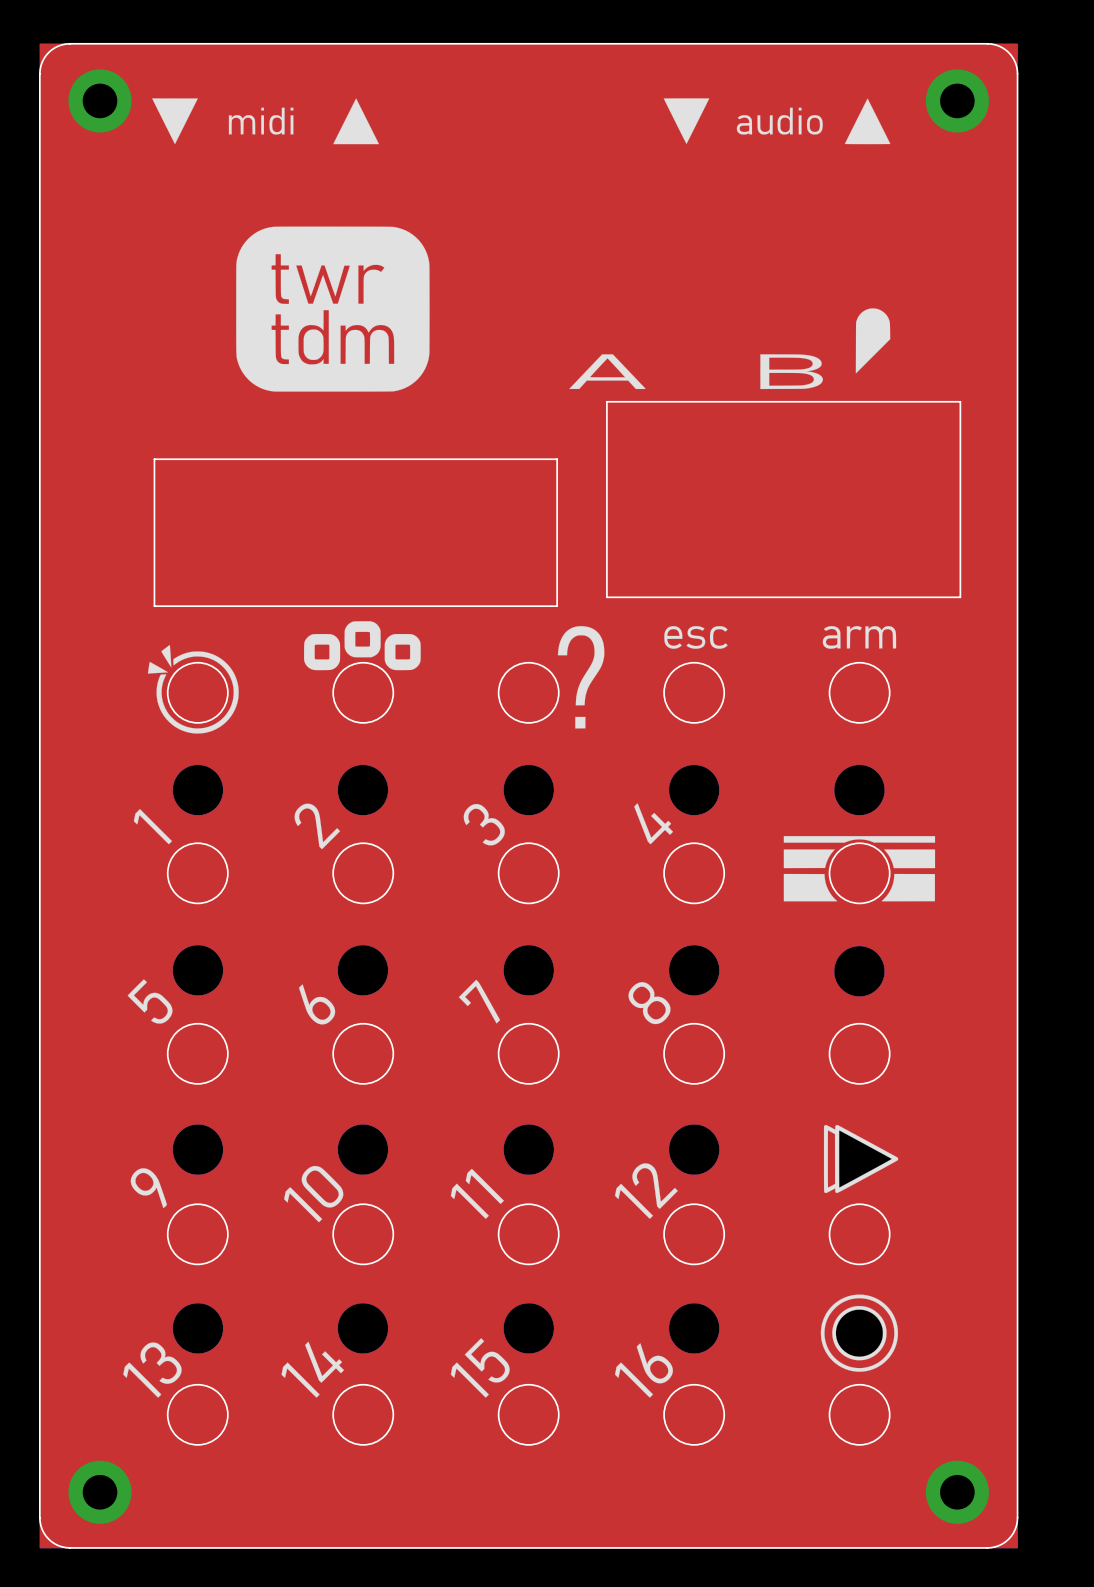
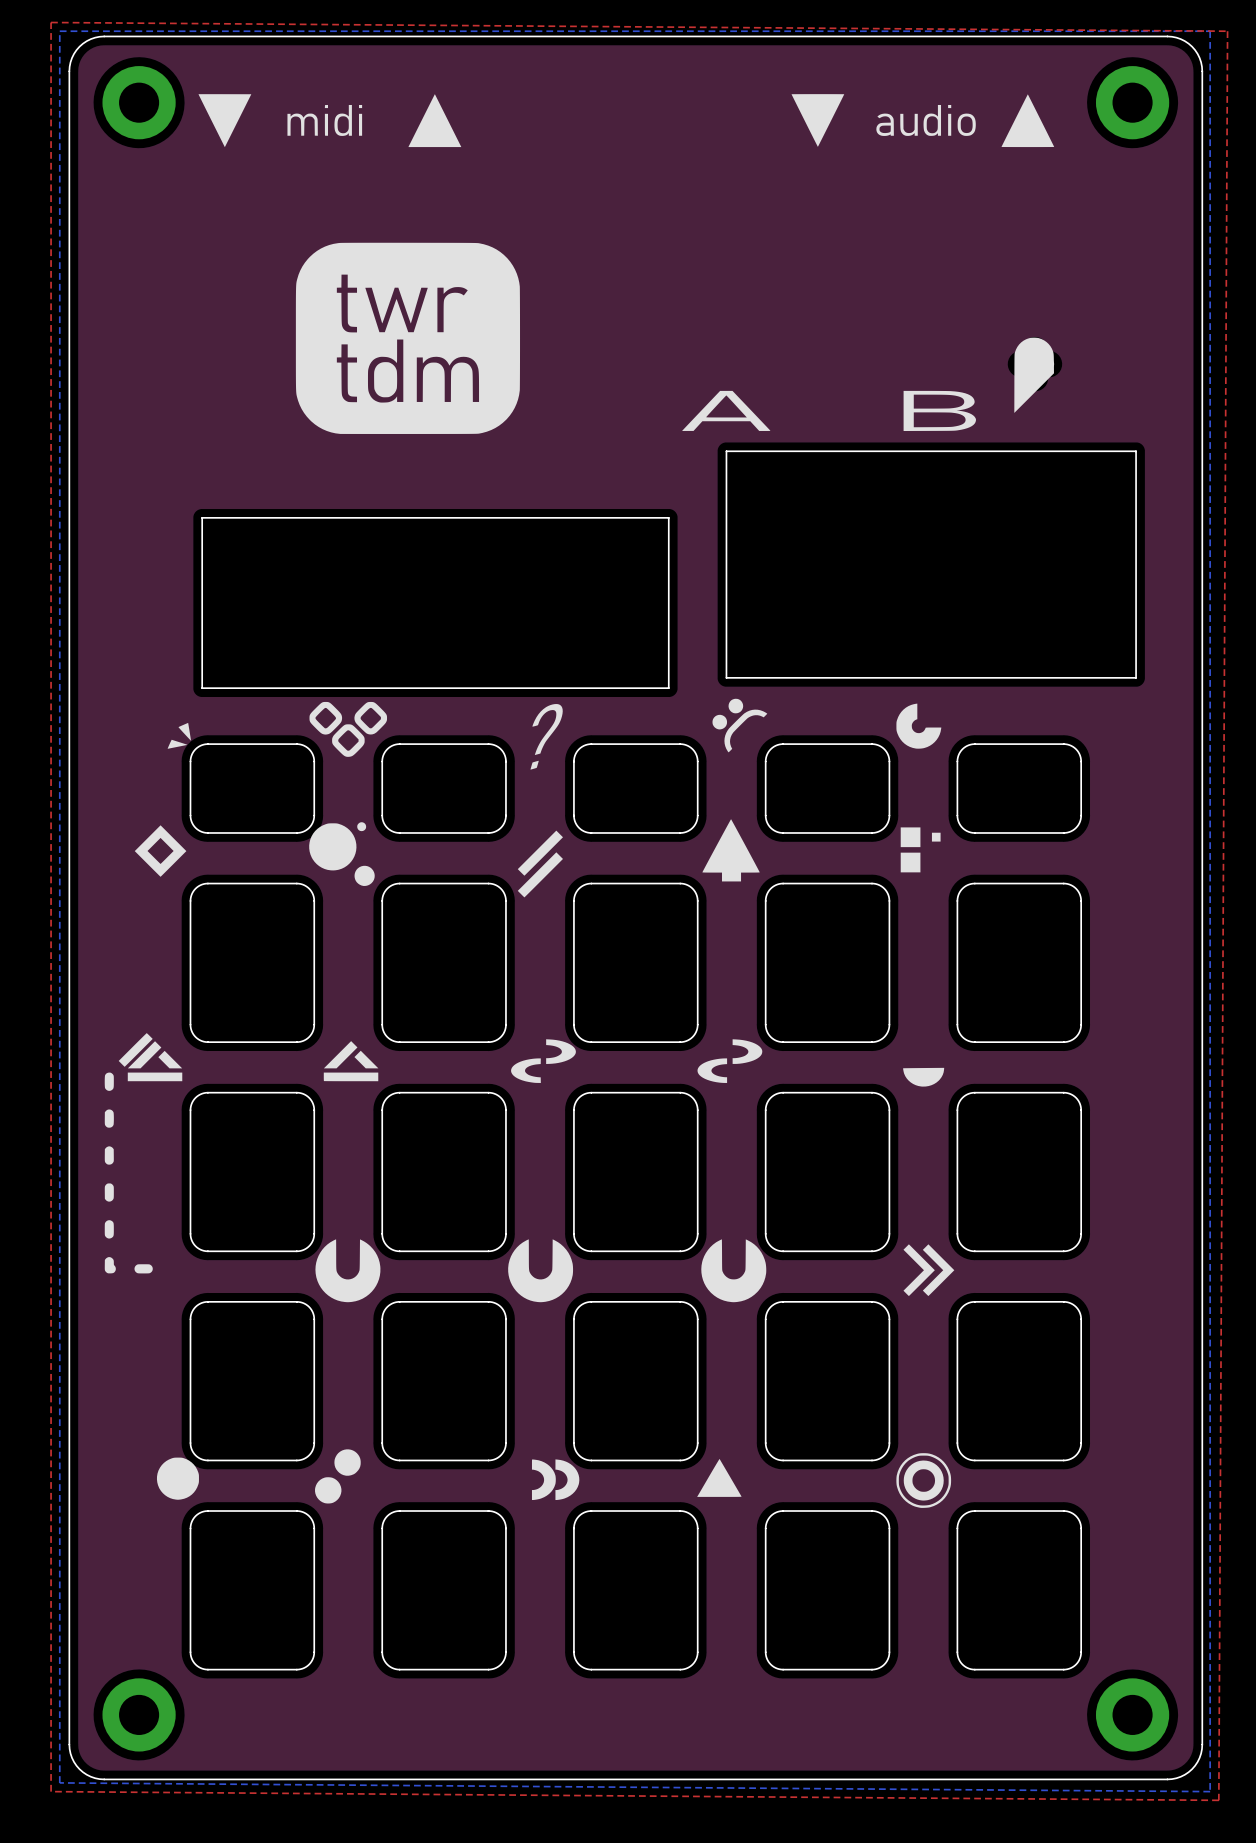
top zone outline: none -> (51, 22) (51, 1791) (1218, 1800) (1227, 31) (51, 22)
bottom zone outline: none -> (59, 31) (59, 1782) (1210, 1791) (1210, 31) (59, 31)
drawing: [39, 43, 1018, 1549] -> none
drawing: none -> [104, 94, 1055, 1508]
board edge: none -> (207, 744) (296, 744) (307, 747) (312, 753) (314, 761) (314, 817) (310, 826) (304, 831) (296, 832) (207, 832) (197, 829) (190, 817) (190, 759) (195, 749) (207, 744)
board edge: none -> (399, 744) (488, 744) (499, 747) (504, 753) (505, 761) (505, 817) (502, 826) (496, 831) (488, 832) (399, 832) (388, 829) (382, 817) (382, 759) (387, 749) (399, 744)
board edge: none -> (591, 744) (680, 744) (691, 747) (695, 753) (697, 761) (697, 817) (693, 826) (687, 831) (680, 832) (591, 832) (580, 829) (574, 817) (574, 759) (579, 749) (591, 744)
board edge: none -> (783, 744) (871, 744) (882, 747) (887, 753) (889, 761) (889, 817) (885, 826) (879, 831) (871, 832) (783, 832) (772, 829) (765, 817) (765, 759) (770, 749) (783, 744)
board edge: none -> (974, 744) (1063, 744) (1074, 747) (1079, 753) (1081, 761) (1081, 817) (1077, 826) (1071, 831) (1063, 832) (974, 832) (963, 829) (957, 817) (957, 759) (963, 747) (974, 744)
round board edge: [167, 662, 229, 724] -> none
round board edge: [332, 662, 394, 724] -> none
round board edge: [498, 662, 560, 724] -> none
round board edge: [663, 662, 725, 724] -> none
round board edge: [829, 662, 891, 724] -> none
board edge: none -> (207, 883) (298, 883) (306, 886) (311, 891) (314, 900) (314, 1024) (311, 1033) (306, 1039) (296, 1042) (207, 1042) (200, 1040) (193, 1033) (190, 1024) (190, 899) (195, 888) (207, 883)
board edge: none -> (399, 883) (490, 883) (497, 886) (503, 891) (505, 900) (505, 1024) (503, 1033) (497, 1039) (488, 1042) (399, 1042) (390, 1039) (384, 1033) (382, 1024) (382, 899) (387, 888) (399, 883)
board edge: none -> (591, 883) (682, 883) (689, 886) (695, 891) (697, 900) (697, 1024) (695, 1032) (689, 1039) (680, 1042) (591, 1042) (583, 1040) (576, 1033) (573, 1024) (574, 899) (580, 887) (591, 883)
board edge: none -> (783, 883) (873, 883) (881, 886) (886, 891) (889, 900) (889, 1024) (887, 1032) (881, 1039) (871, 1042) (783, 1042) (773, 1039) (768, 1033) (765, 1024) (765, 899) (770, 888) (783, 883)
board edge: none -> (974, 883) (1065, 883) (1072, 886) (1078, 891) (1081, 900) (1081, 1024) (1079, 1032) (1072, 1039) (1063, 1042) (974, 1042) (965, 1039) (960, 1033) (957, 1024) (957, 899) (962, 888) (974, 883)
round board edge: [167, 842, 229, 904] -> none
round board edge: [332, 842, 394, 904] -> none
round board edge: [498, 842, 560, 904] -> none
round board edge: [663, 842, 725, 904] -> none
round board edge: [829, 842, 891, 904] -> none
board edge: none -> (207, 1092) (298, 1092) (306, 1095) (311, 1100) (314, 1110) (314, 1233) (312, 1241) (306, 1248) (296, 1251) (207, 1251) (198, 1248) (193, 1243) (190, 1233) (190, 1108) (195, 1097) (207, 1092)
board edge: none -> (399, 1092) (490, 1092) (497, 1095) (503, 1100) (505, 1110) (505, 1233) (504, 1241) (497, 1248) (488, 1251) (399, 1251) (390, 1248) (384, 1243) (382, 1233) (382, 1108) (388, 1096) (399, 1092)
board edge: none -> (591, 1092) (682, 1092) (689, 1095) (695, 1100) (697, 1110) (697, 1233) (695, 1241) (689, 1248) (680, 1251) (591, 1251) (582, 1248) (576, 1243) (573, 1233) (574, 1108) (580, 1096) (591, 1092)
board edge: none -> (783, 1092) (873, 1092) (881, 1095) (886, 1100) (889, 1110) (889, 1233) (887, 1241) (881, 1248) (871, 1251) (783, 1251) (775, 1249) (768, 1243) (765, 1233) (765, 1108) (770, 1097) (783, 1092)
board edge: none -> (974, 1092) (1065, 1092) (1072, 1095) (1078, 1100) (1081, 1110) (1081, 1233) (1079, 1241) (1072, 1248) (1063, 1251) (974, 1251) (967, 1249) (960, 1243) (957, 1233) (957, 1108) (962, 1097) (974, 1092)
round board edge: [167, 1023, 229, 1085] -> none
round board edge: [332, 1023, 394, 1085] -> none
round board edge: [498, 1023, 560, 1085] -> none
round board edge: [663, 1023, 725, 1085] -> none
round board edge: [829, 1023, 891, 1085] -> none
board edge: none -> (207, 1301) (298, 1301) (306, 1304) (311, 1310) (314, 1319) (314, 1443) (312, 1450) (306, 1457) (296, 1460) (207, 1460) (200, 1458) (193, 1452) (190, 1443) (190, 1317) (195, 1306) (207, 1301)
board edge: none -> (399, 1301) (490, 1301) (497, 1304) (503, 1310) (505, 1319) (505, 1443) (503, 1452) (497, 1457) (488, 1460) (399, 1460) (390, 1457) (384, 1452) (382, 1443) (382, 1317) (388, 1305) (399, 1301)
board edge: none -> (591, 1301) (682, 1301) (689, 1304) (695, 1310) (697, 1319) (697, 1443) (695, 1452) (689, 1457) (680, 1460) (591, 1460) (582, 1457) (576, 1452) (573, 1443) (574, 1317) (579, 1306) (591, 1301)
board edge: none -> (783, 1301) (873, 1301) (881, 1304) (886, 1310) (889, 1319) (889, 1443) (887, 1450) (881, 1457) (871, 1460) (783, 1460) (775, 1458) (768, 1452) (765, 1443) (765, 1317) (770, 1306) (783, 1301)
board edge: none -> (974, 1301) (1065, 1301) (1072, 1304) (1078, 1310) (1081, 1319) (1081, 1443) (1079, 1450) (1072, 1457) (1063, 1460) (974, 1460) (967, 1458) (960, 1452) (957, 1443) (957, 1317) (962, 1306) (974, 1301)
round board edge: [167, 1203, 229, 1265] -> none
round board edge: [332, 1203, 394, 1265] -> none
round board edge: [498, 1203, 560, 1265] -> none
round board edge: [663, 1203, 725, 1265] -> none
round board edge: [829, 1203, 891, 1265] -> none
board edge: none -> (207, 1511) (298, 1511) (306, 1513) (311, 1519) (314, 1528) (314, 1652) (312, 1659) (306, 1666) (296, 1669) (207, 1669) (200, 1667) (193, 1661) (190, 1652) (190, 1526) (195, 1516) (207, 1511)
board edge: none -> (399, 1511) (490, 1511) (497, 1513) (503, 1519) (505, 1528) (505, 1652) (504, 1659) (497, 1666) (488, 1669) (399, 1669) (390, 1666) (384, 1661) (382, 1652) (382, 1526) (388, 1514) (399, 1511)
board edge: none -> (591, 1511) (682, 1511) (689, 1513) (695, 1519) (697, 1528) (697, 1652) (695, 1659) (689, 1666) (680, 1669) (591, 1669) (582, 1666) (576, 1661) (573, 1652) (574, 1526) (580, 1514) (591, 1511)
board edge: none -> (783, 1511) (873, 1511) (881, 1513) (886, 1519) (889, 1528) (889, 1652) (887, 1659) (881, 1666) (871, 1669) (783, 1669) (775, 1667) (768, 1661) (765, 1652) (765, 1526) (770, 1516) (783, 1511)
board edge: none -> (974, 1511) (1065, 1511) (1072, 1513) (1078, 1519) (1081, 1528) (1081, 1652) (1079, 1659) (1072, 1666) (1063, 1669) (974, 1669) (965, 1666) (960, 1661) (957, 1652) (957, 1526) (963, 1514) (974, 1511)
round board edge: [167, 1384, 229, 1446] -> none
round board edge: [332, 1384, 394, 1446] -> none
round board edge: [498, 1384, 560, 1446] -> none
round board edge: [663, 1384, 725, 1446] -> none
round board edge: [829, 1384, 891, 1446] -> none

